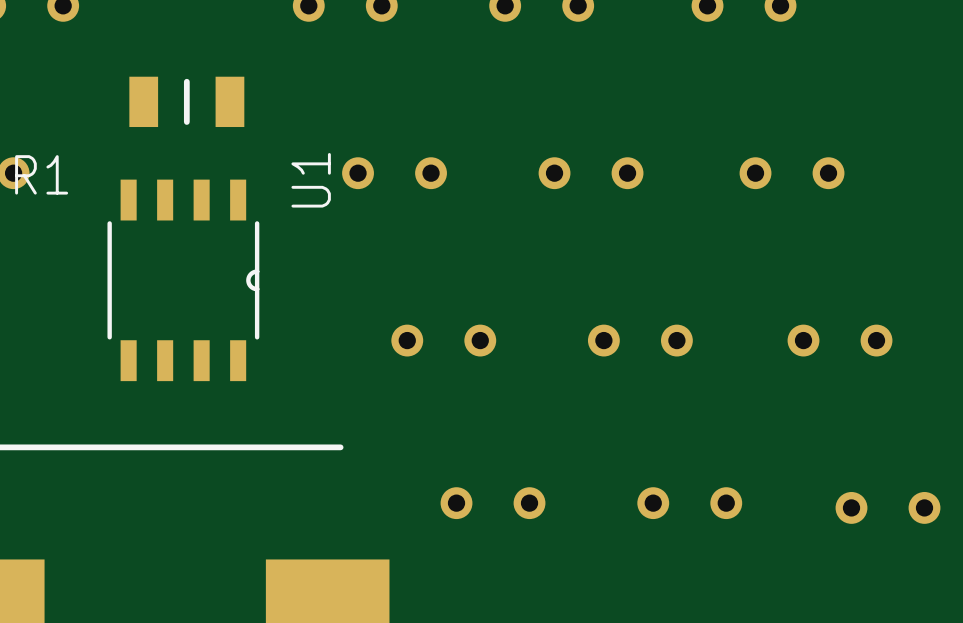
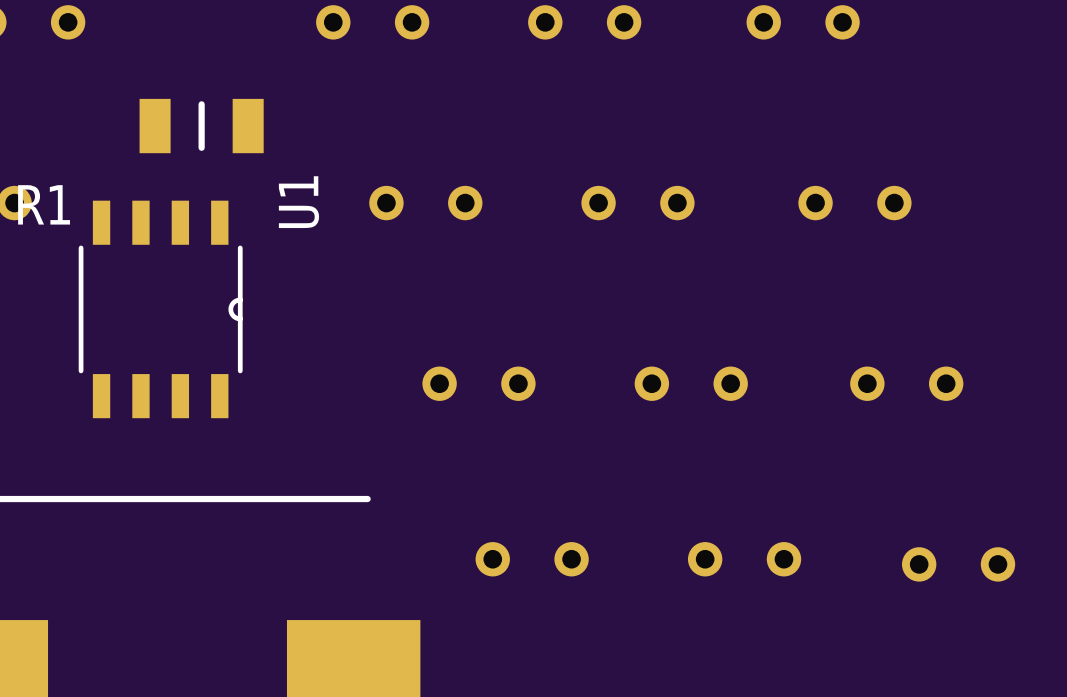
U1 position: (183, 280) -> (160, 309)

